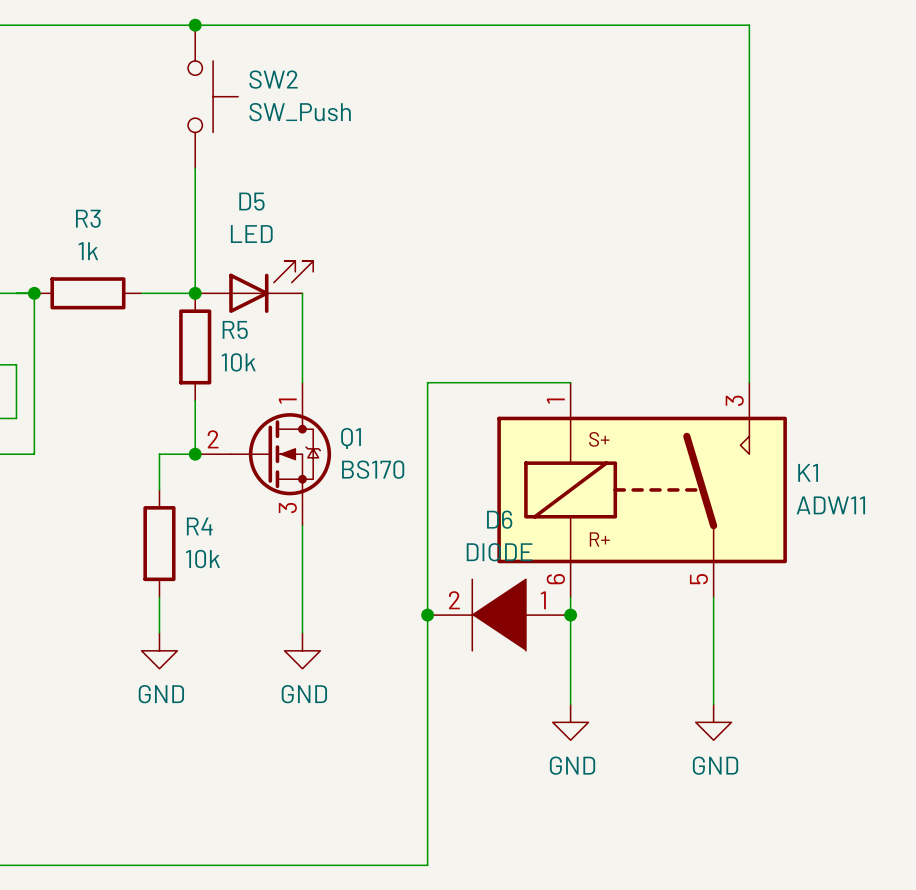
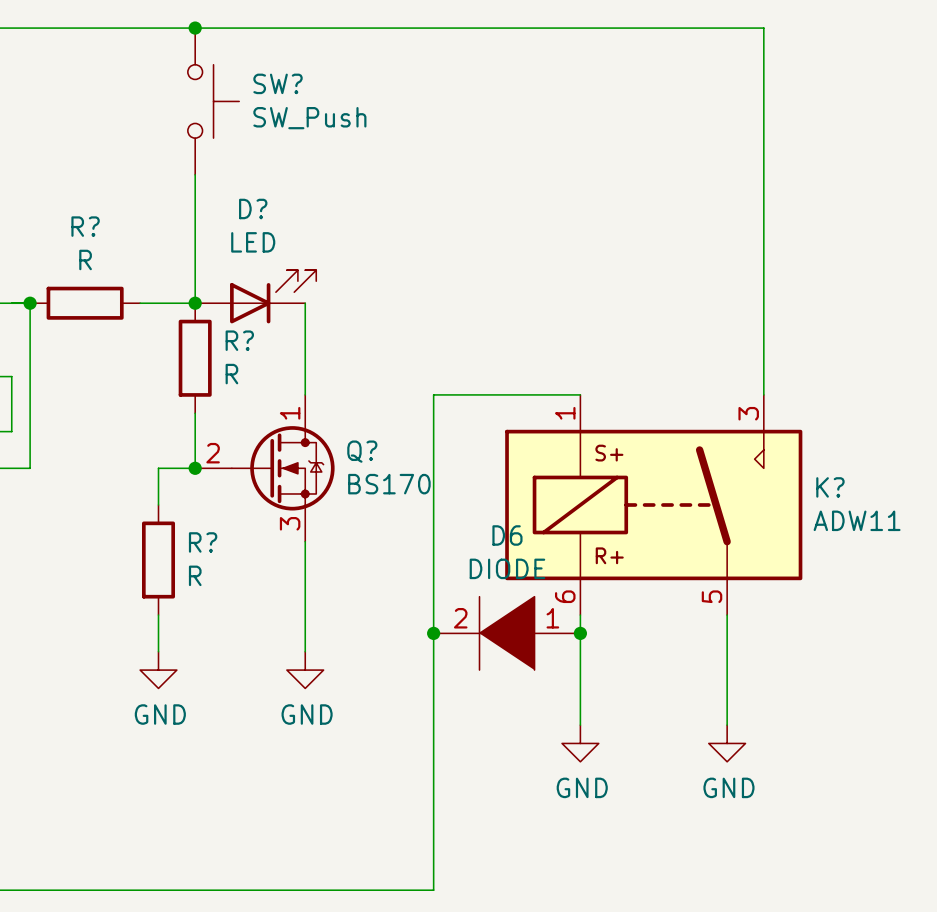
SW2 name: SW2 (273, 79) -> SW? (278, 83)
D5 name: D5 (251, 201) -> D? (253, 208)
R3 name: R3 (88, 218) -> R? (85, 226)
R3 value: 1k (88, 251) -> R (85, 259)
R5 name: R5 (235, 329) -> R? (239, 340)
R5 value: 10k (238, 362) -> R (231, 374)
Q1 name: Q1 (351, 438) -> Q? (362, 451)
K1 name: K1 (808, 472) -> K? (830, 487)
R4 name: R4 (199, 526) -> R? (203, 542)
R4 value: 10k (202, 559) -> R (195, 575)

